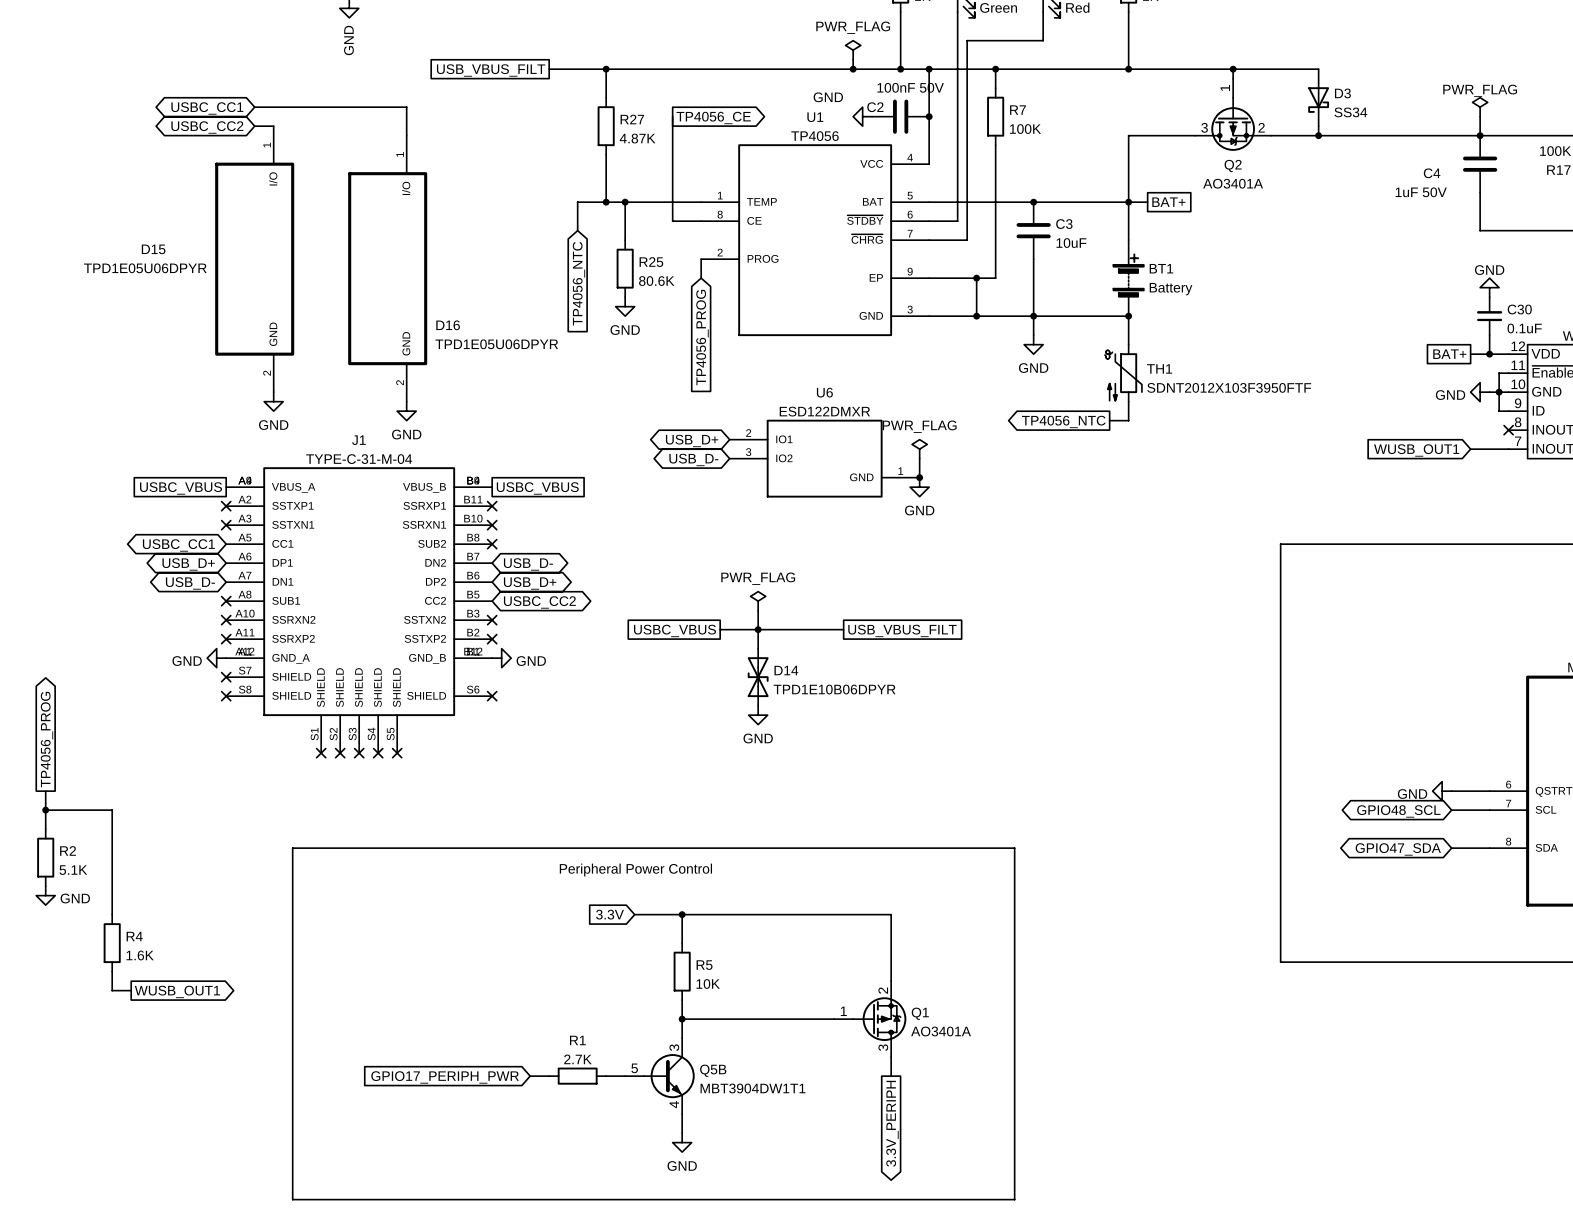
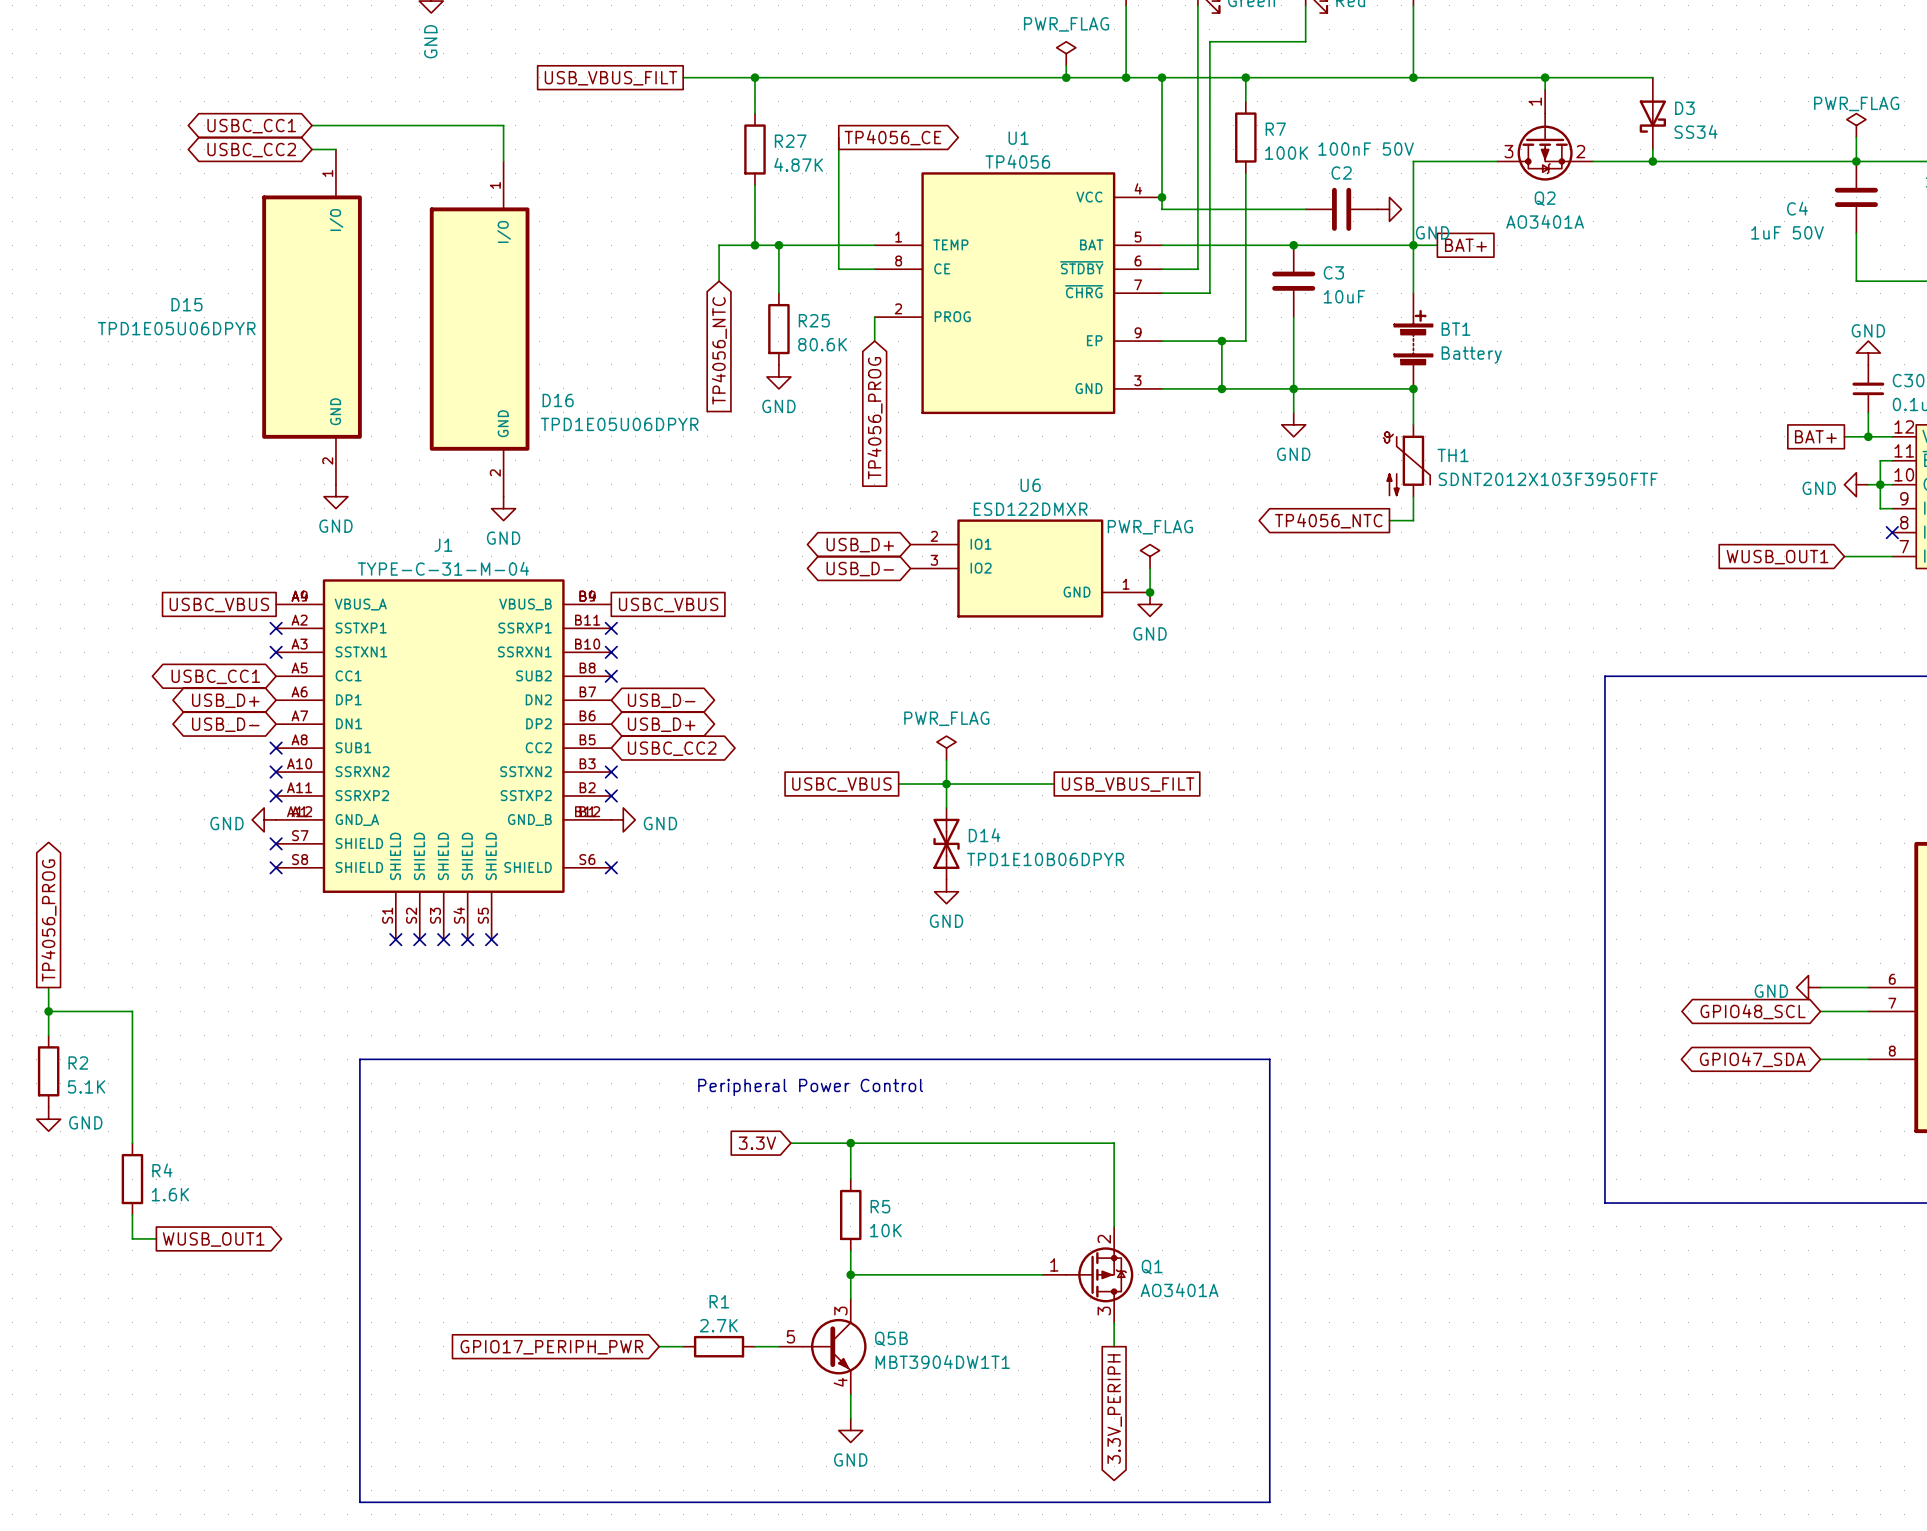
C2 value position: 100nF 50V (910, 87) -> 100nF 50V (1366, 149)
C2 name position: C2 (875, 107) -> C2 (1341, 173)
power symbol: GND (862, 116) -> none
C2 position: (900, 116) -> (1341, 209)
junction: (929, 116) -> none
wire: none -> (1162, 197) (1162, 209) (1305, 209)
junction: none -> (1162, 197)
power symbol: none -> GND (1389, 209)

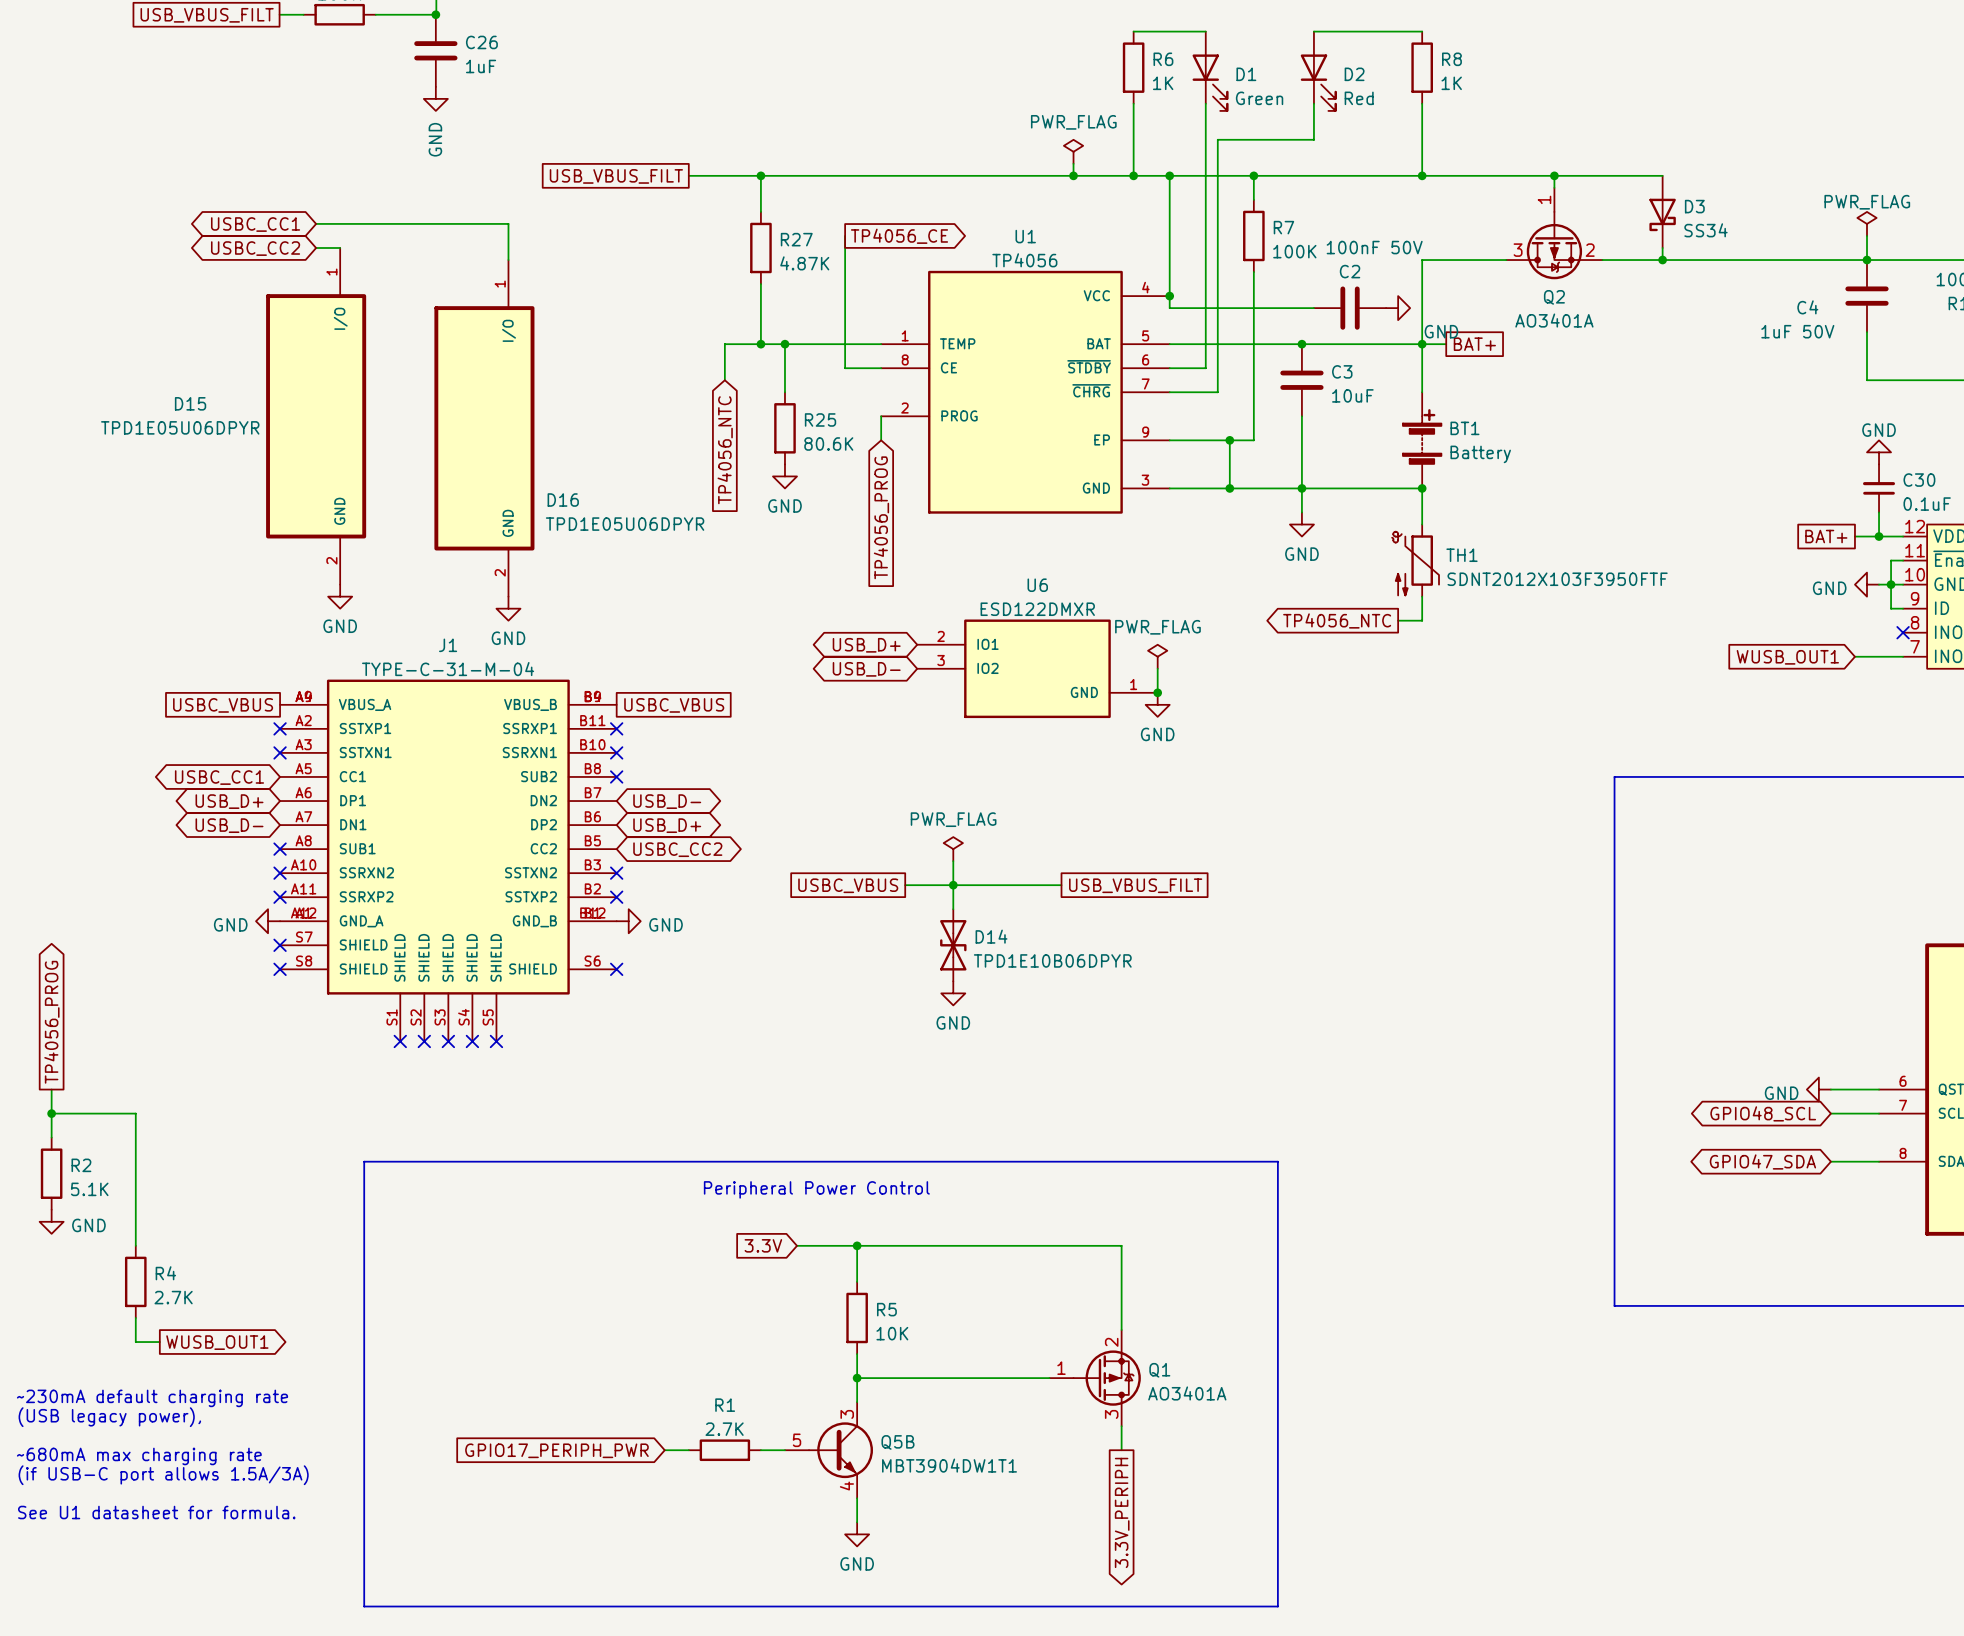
R4 value: 1.6K (170, 1194) -> 2.7K (173, 1297)
text: none -> ~230mA default charging rate (152, 1398)
text: none -> (USB legacy power), (109, 1417)
text: none -> ~680mA max charging rate (139, 1456)
text: none -> (if USB-C port allows 1.5A/3A) (163, 1475)
text: none -> See U1 datasheet for formula. (156, 1512)

